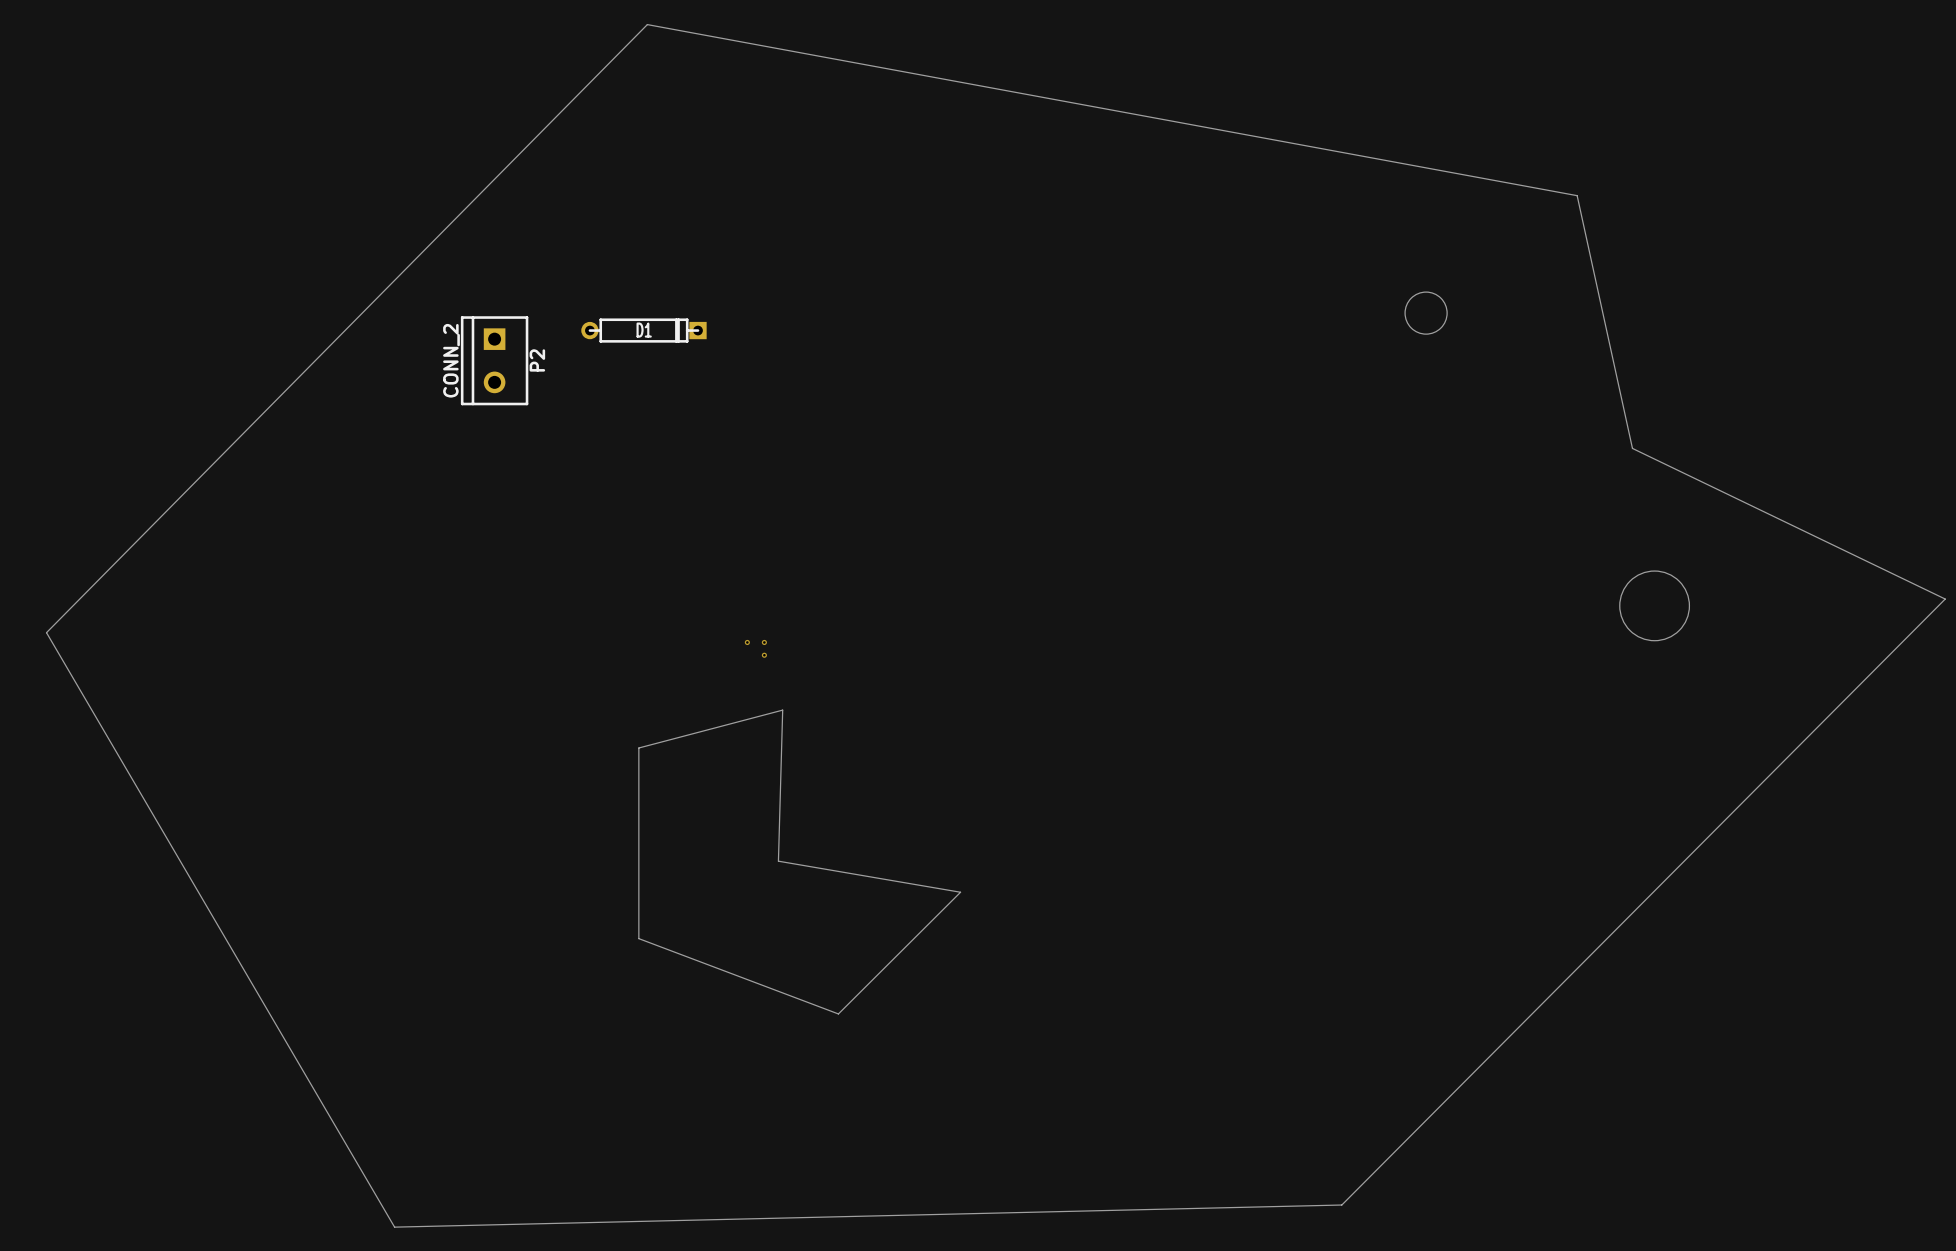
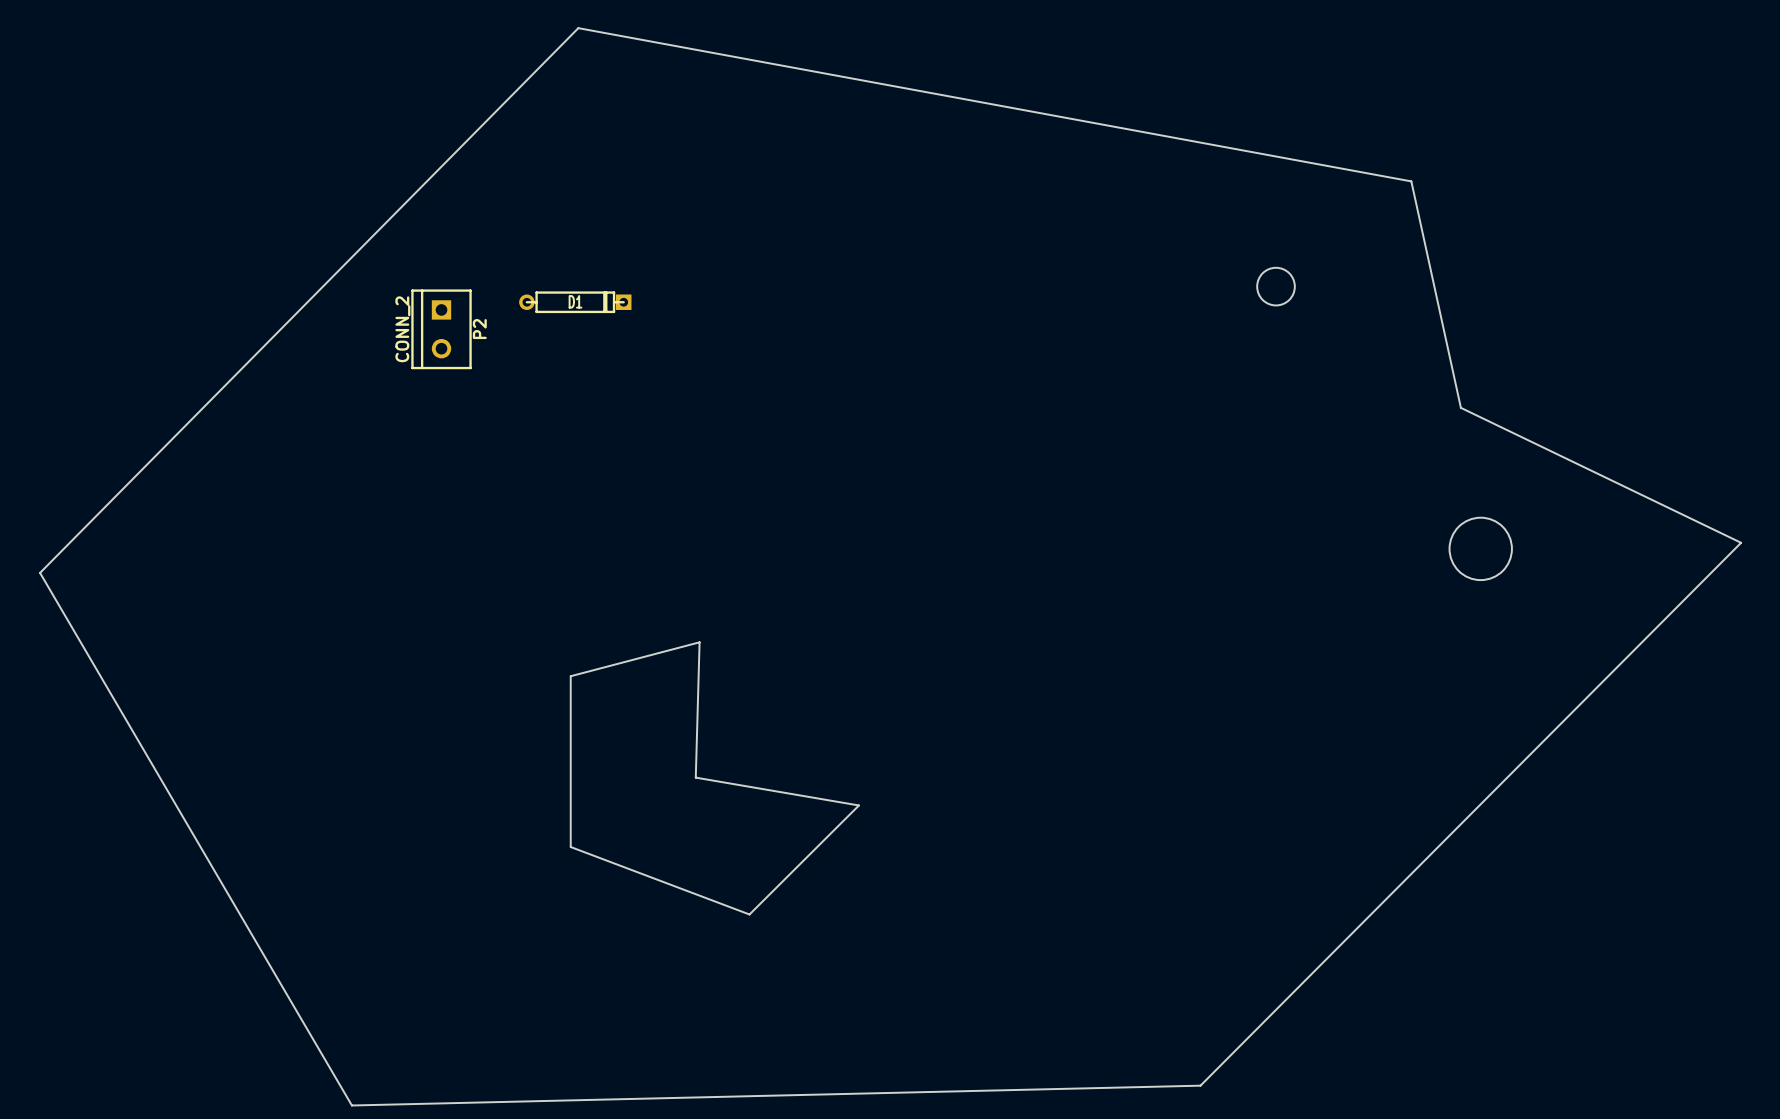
via: (747, 642) -> none
via: (764, 642) -> none
via: (764, 655) -> none

